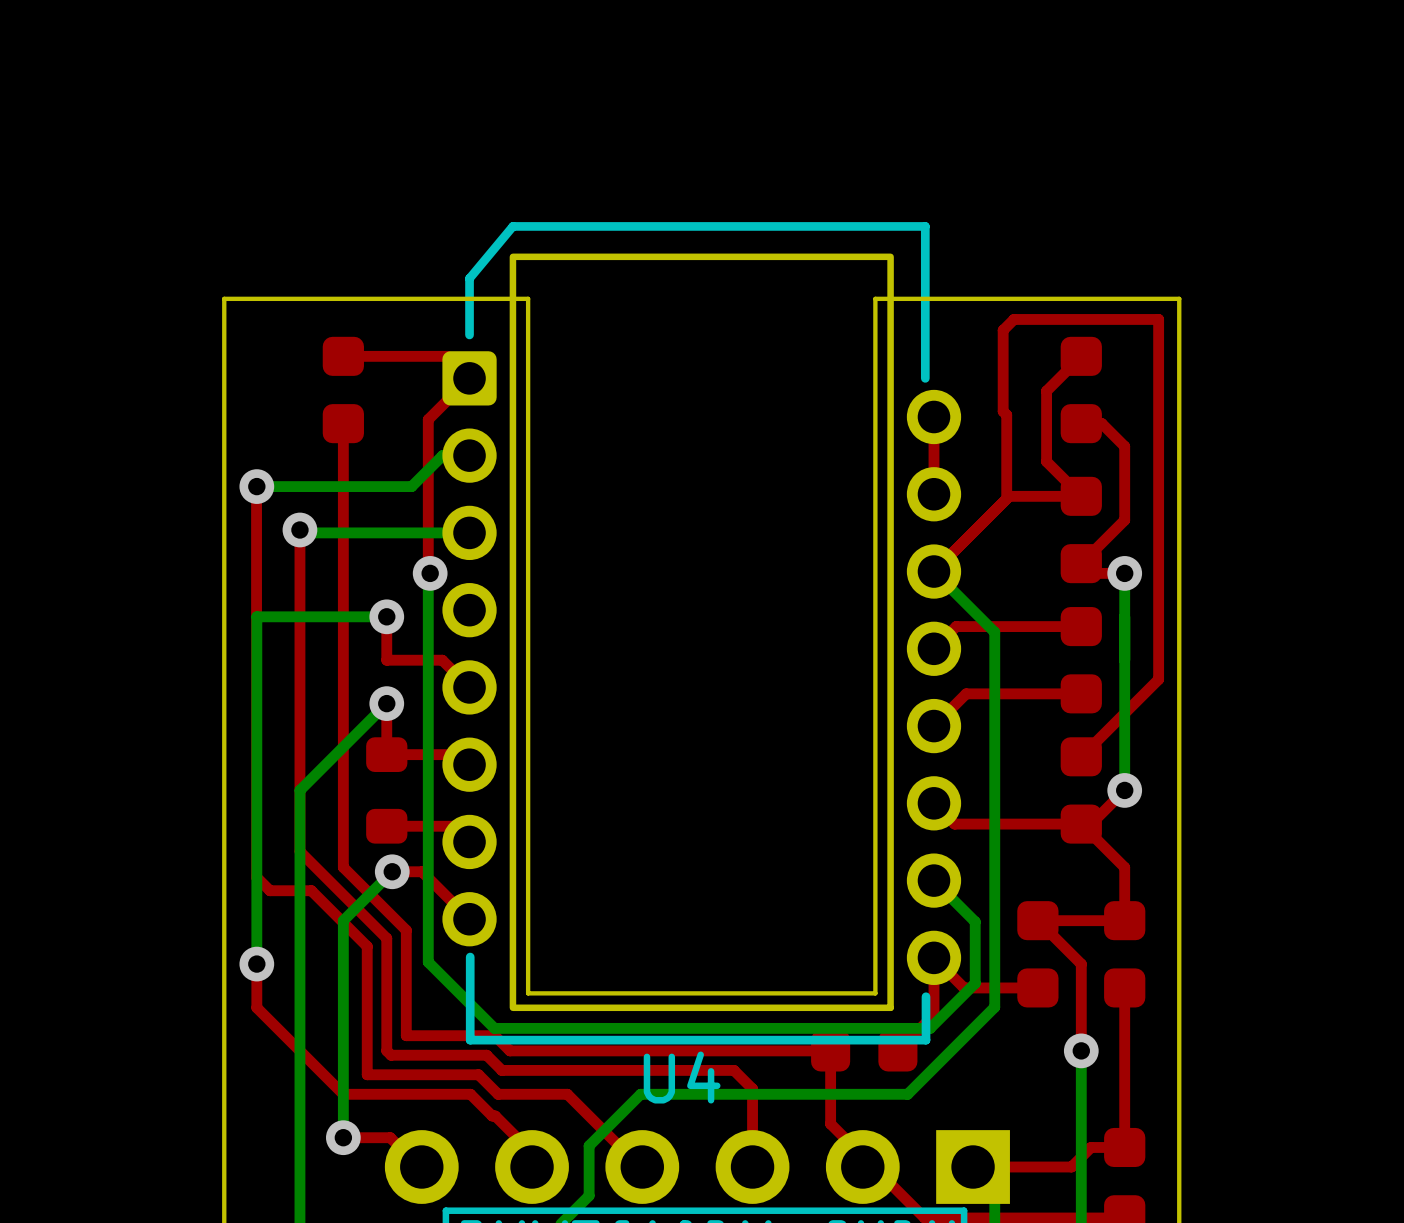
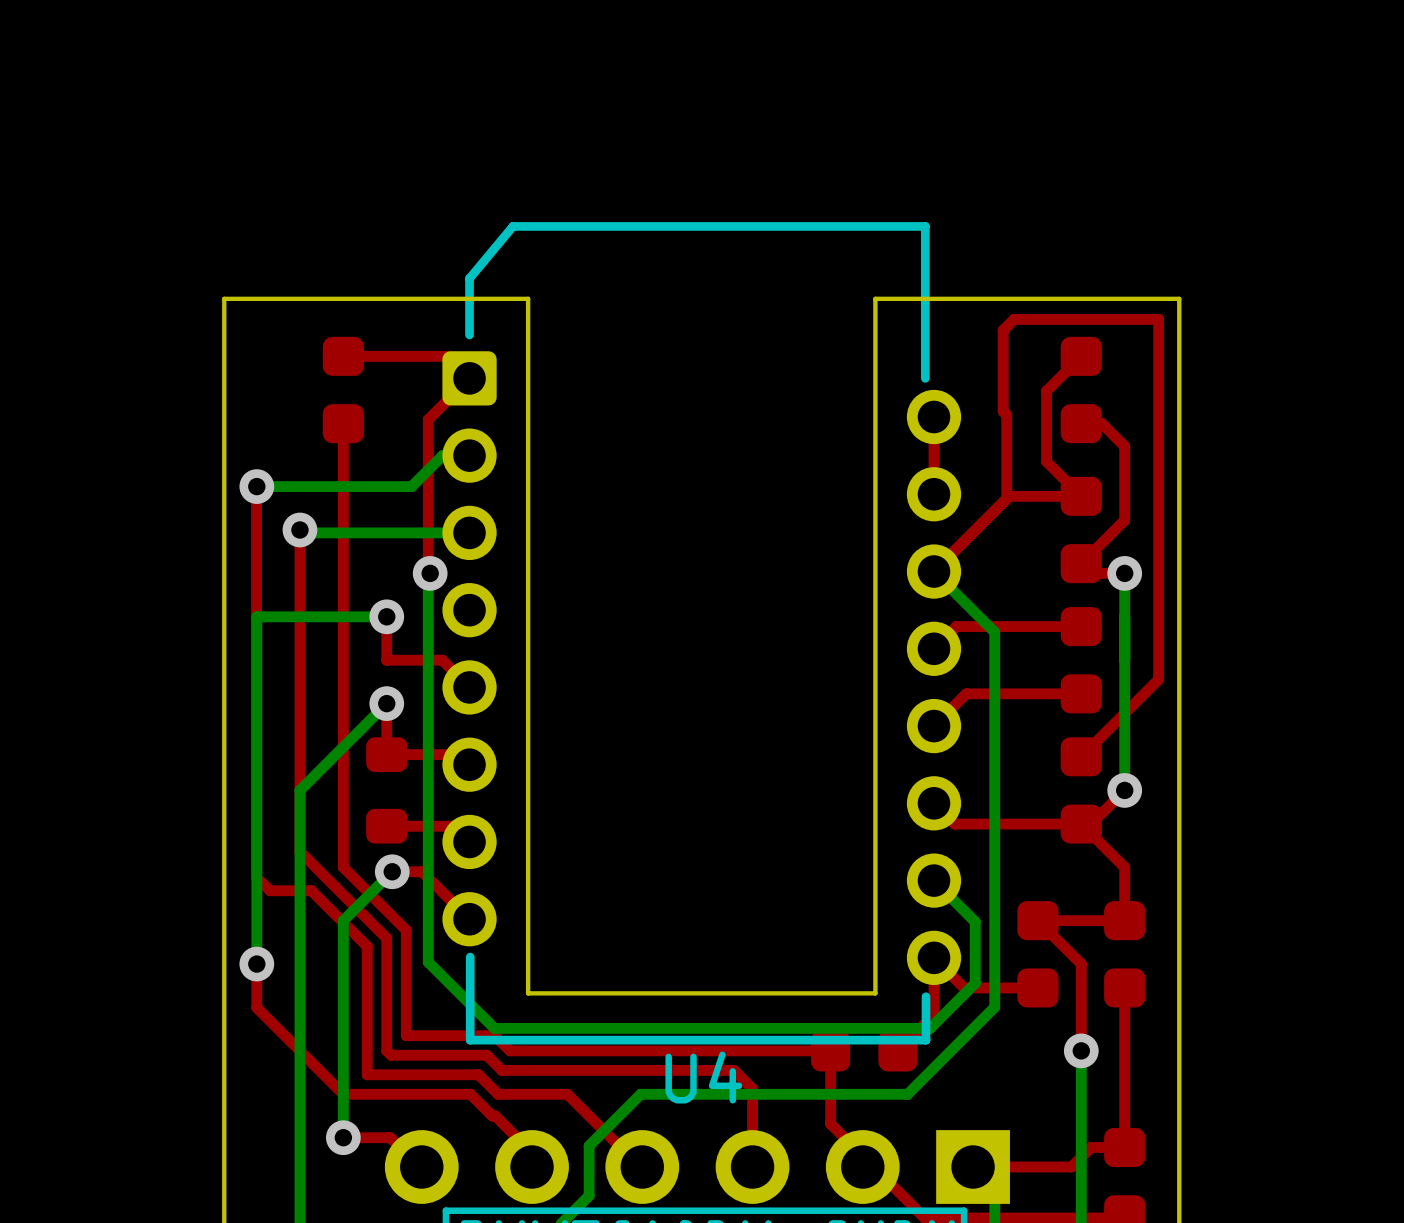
U4 footprint: [442, 222, 962, 1045] -> [442, 222, 962, 1045]

